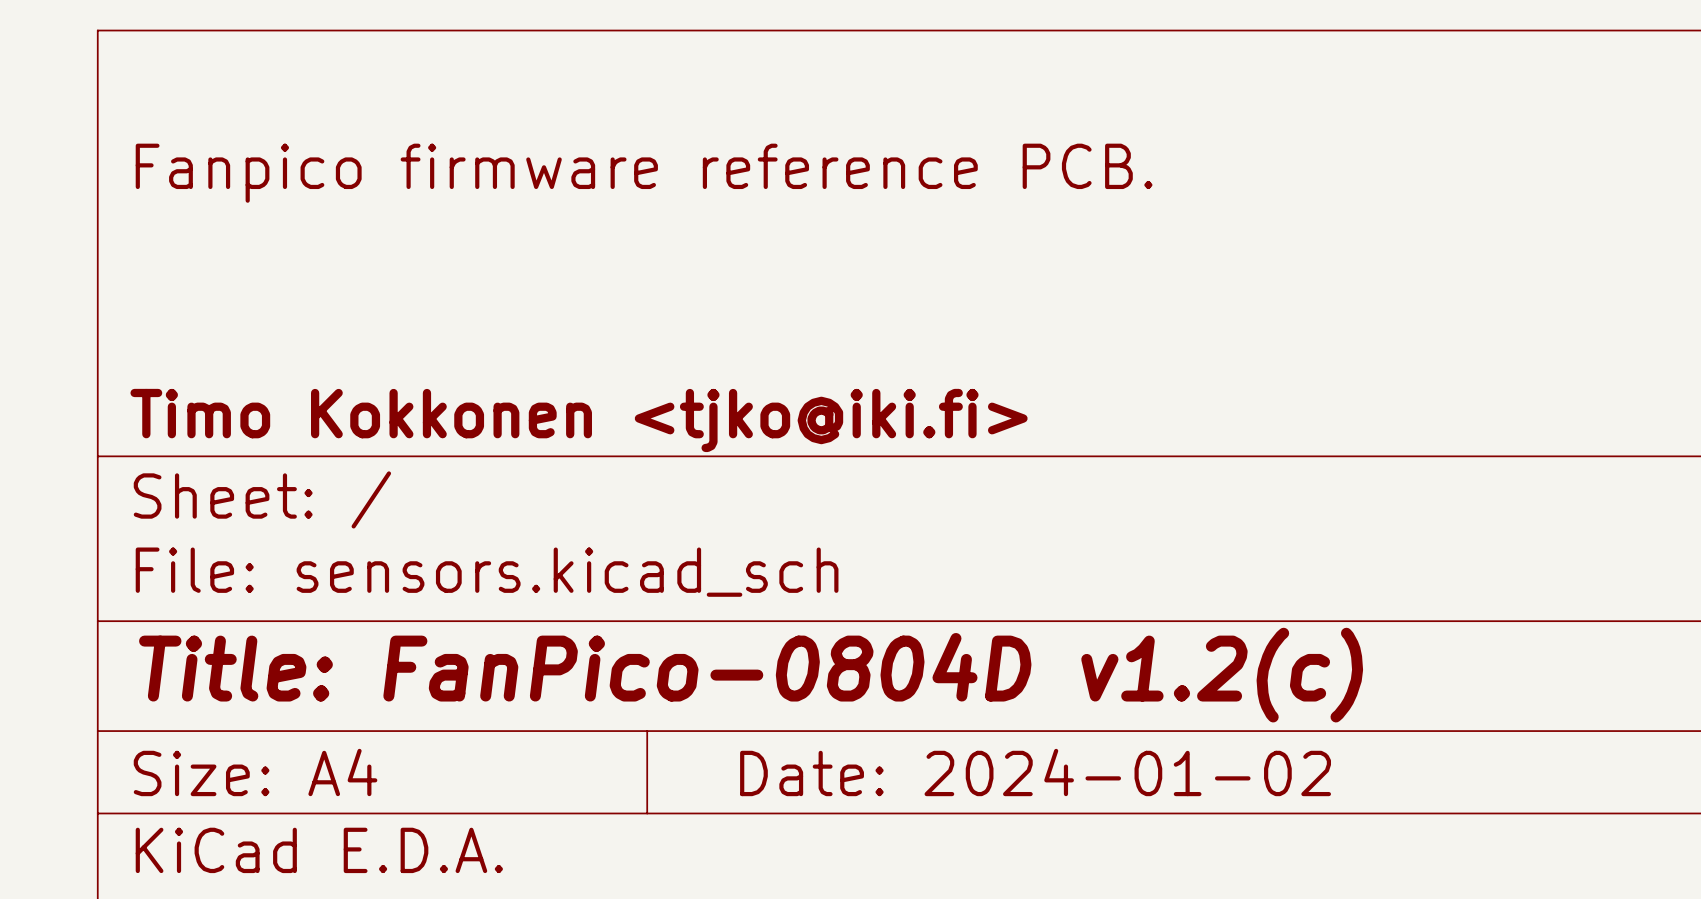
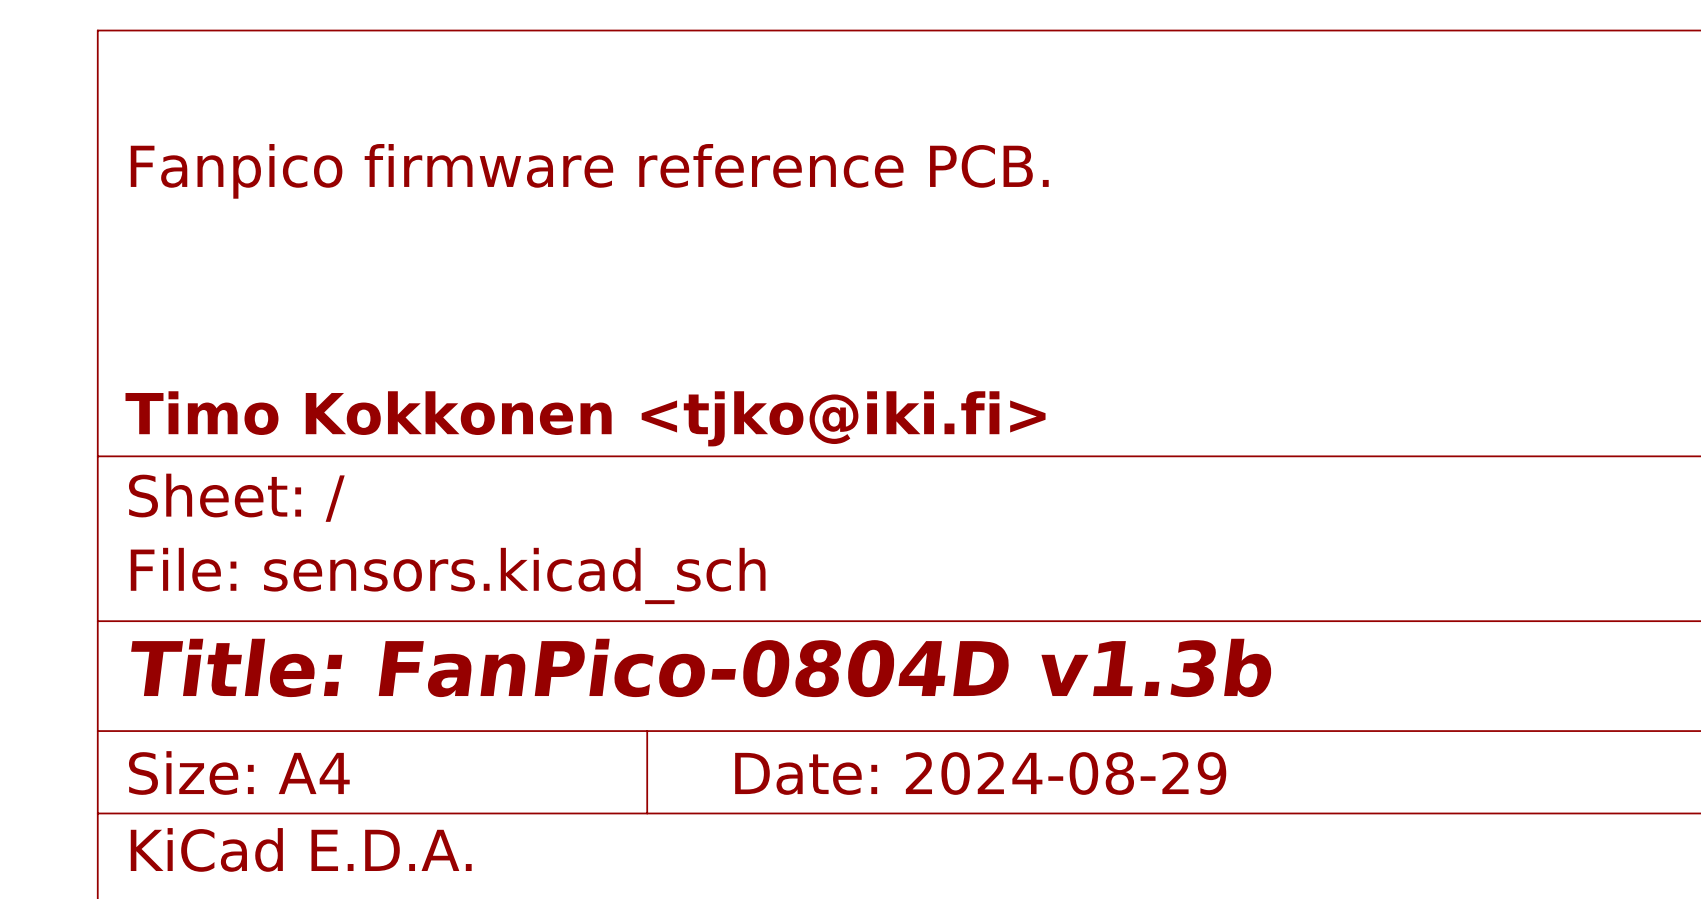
title block: Title: FanPico-0804D v1.2(c) (751, 675) -> Title: FanPico-0804D v1.3b (701, 667)
title block: Date: 2024-01-02 (1035, 772) -> Date: 2024-08-29 (980, 773)

